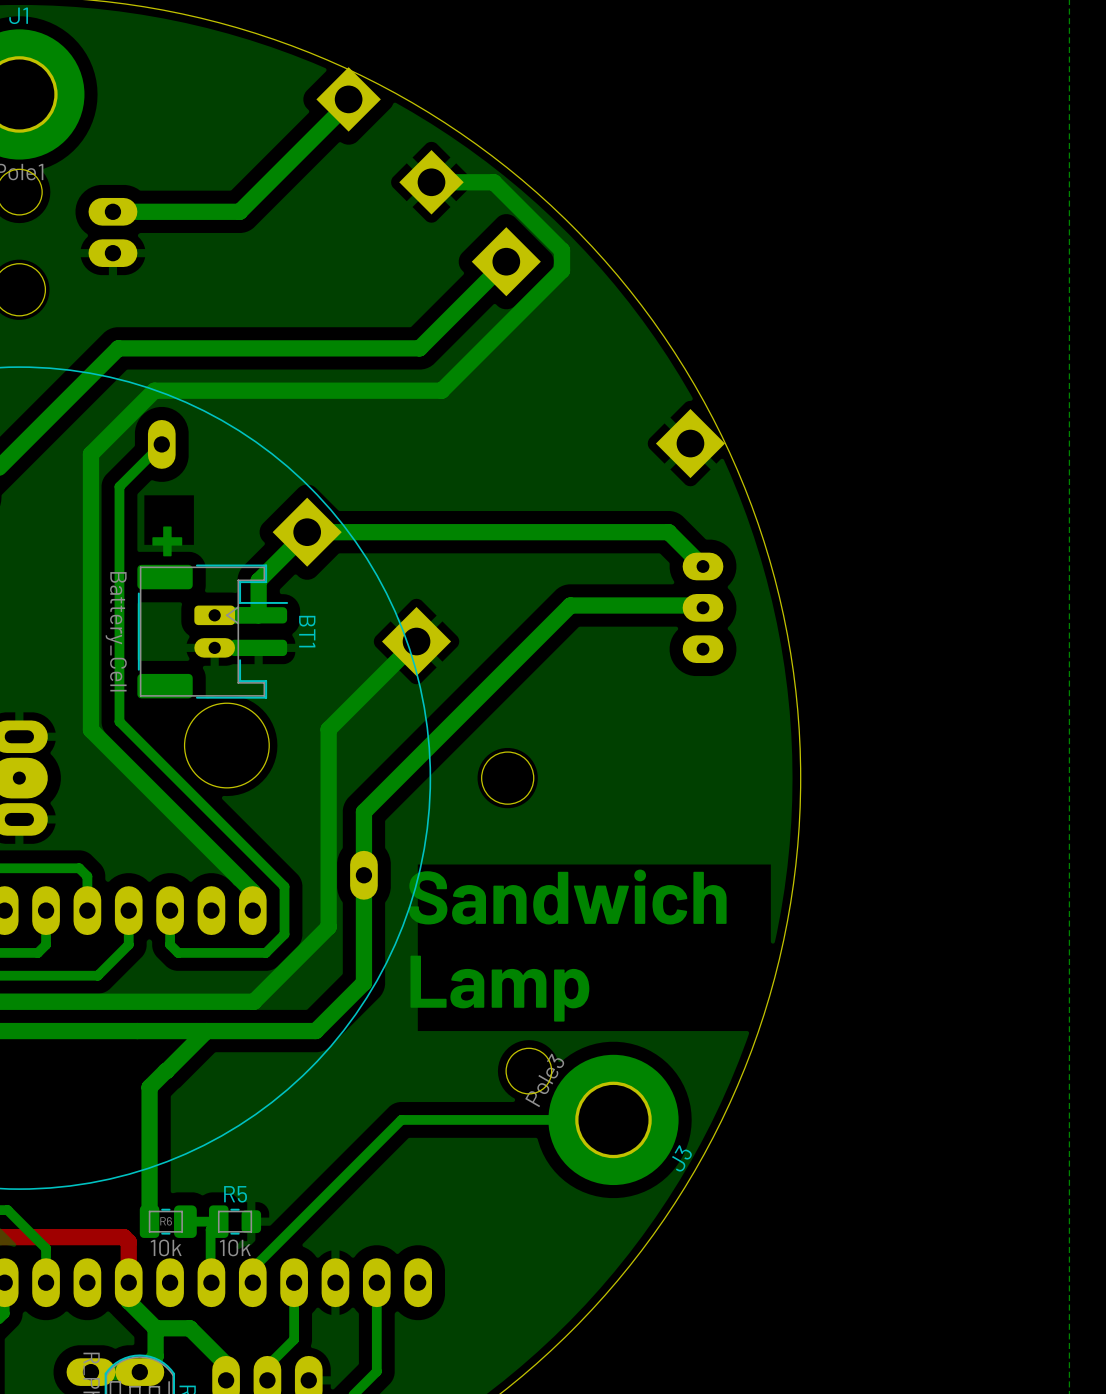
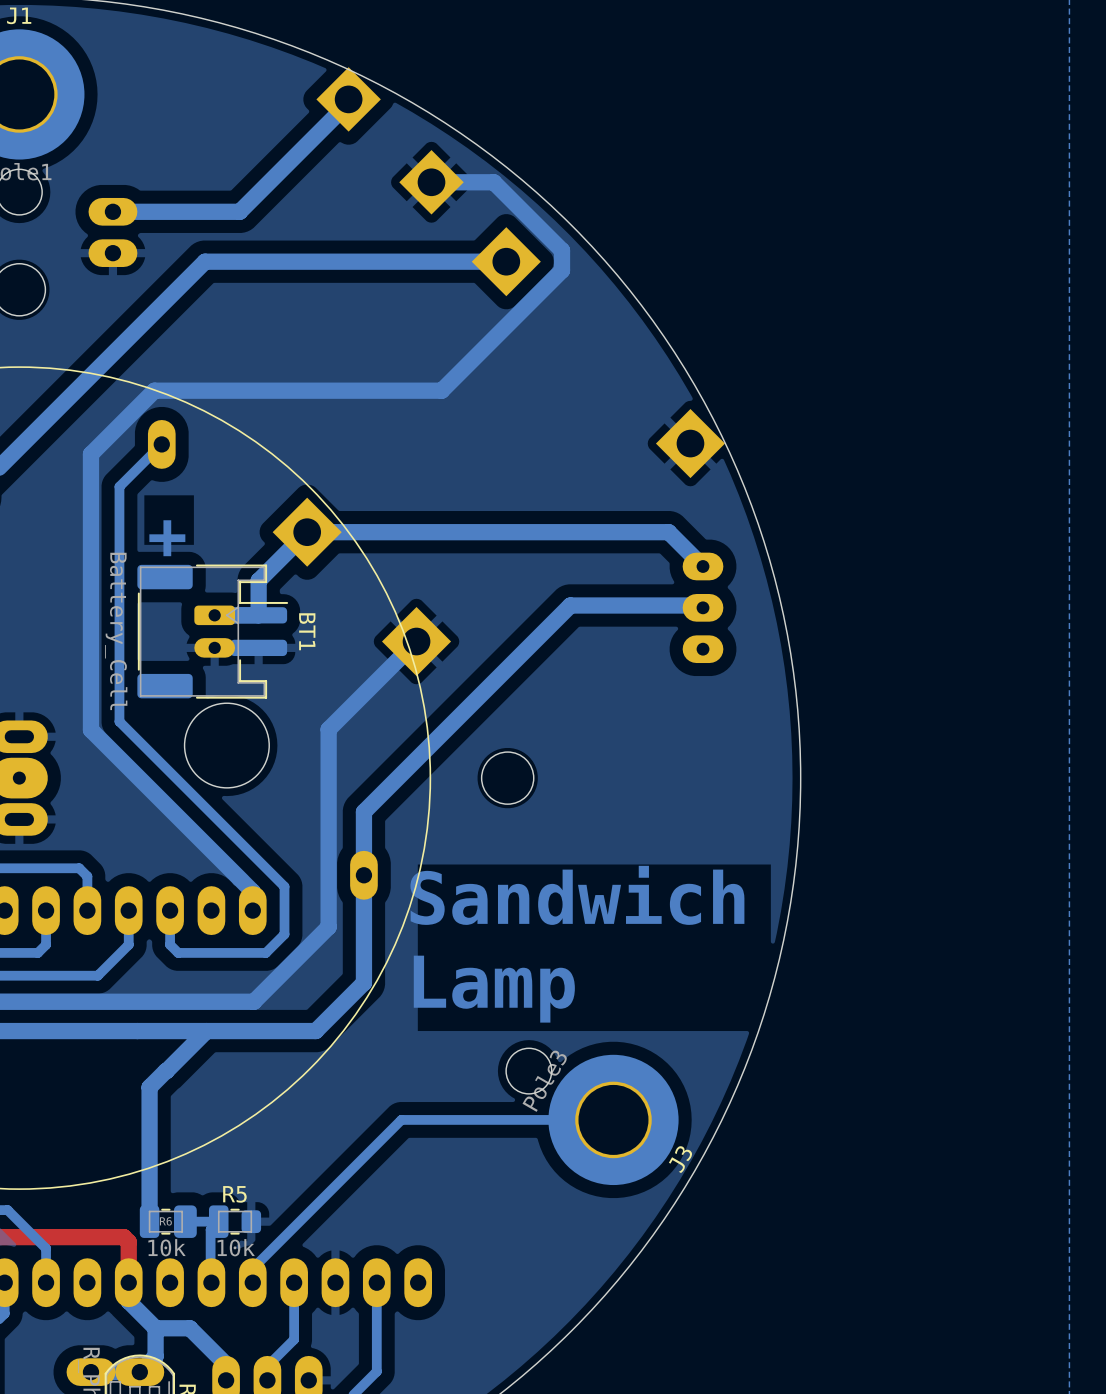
bottom track: (506, 261) (419, 348) (118, 348) -> (506, 261) (205, 261) (118, 348)

